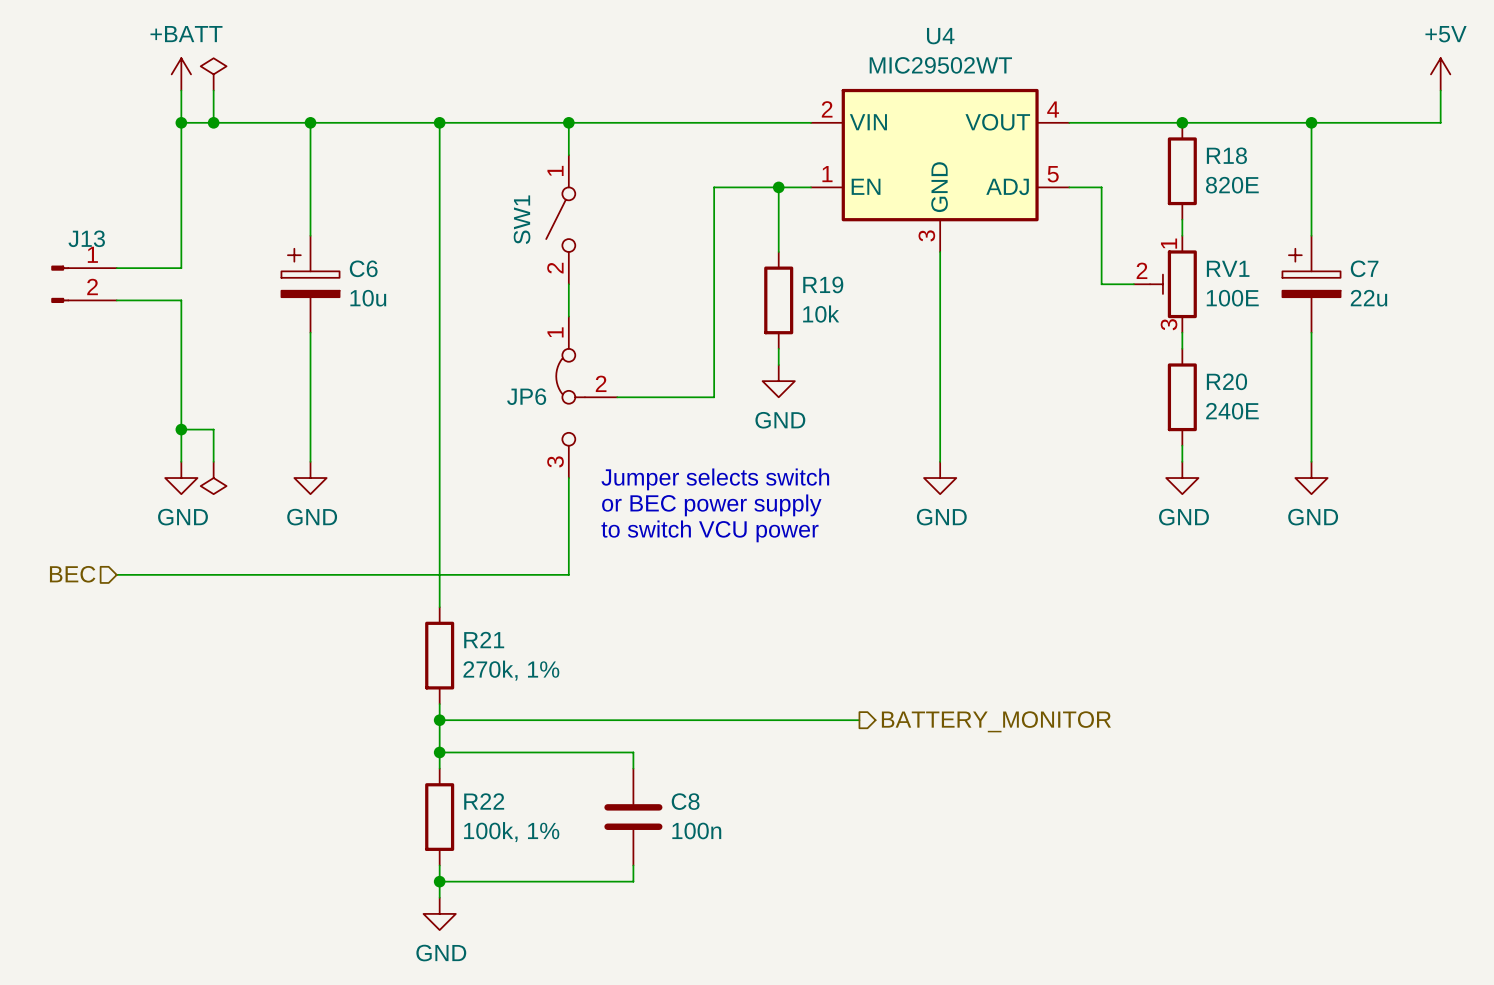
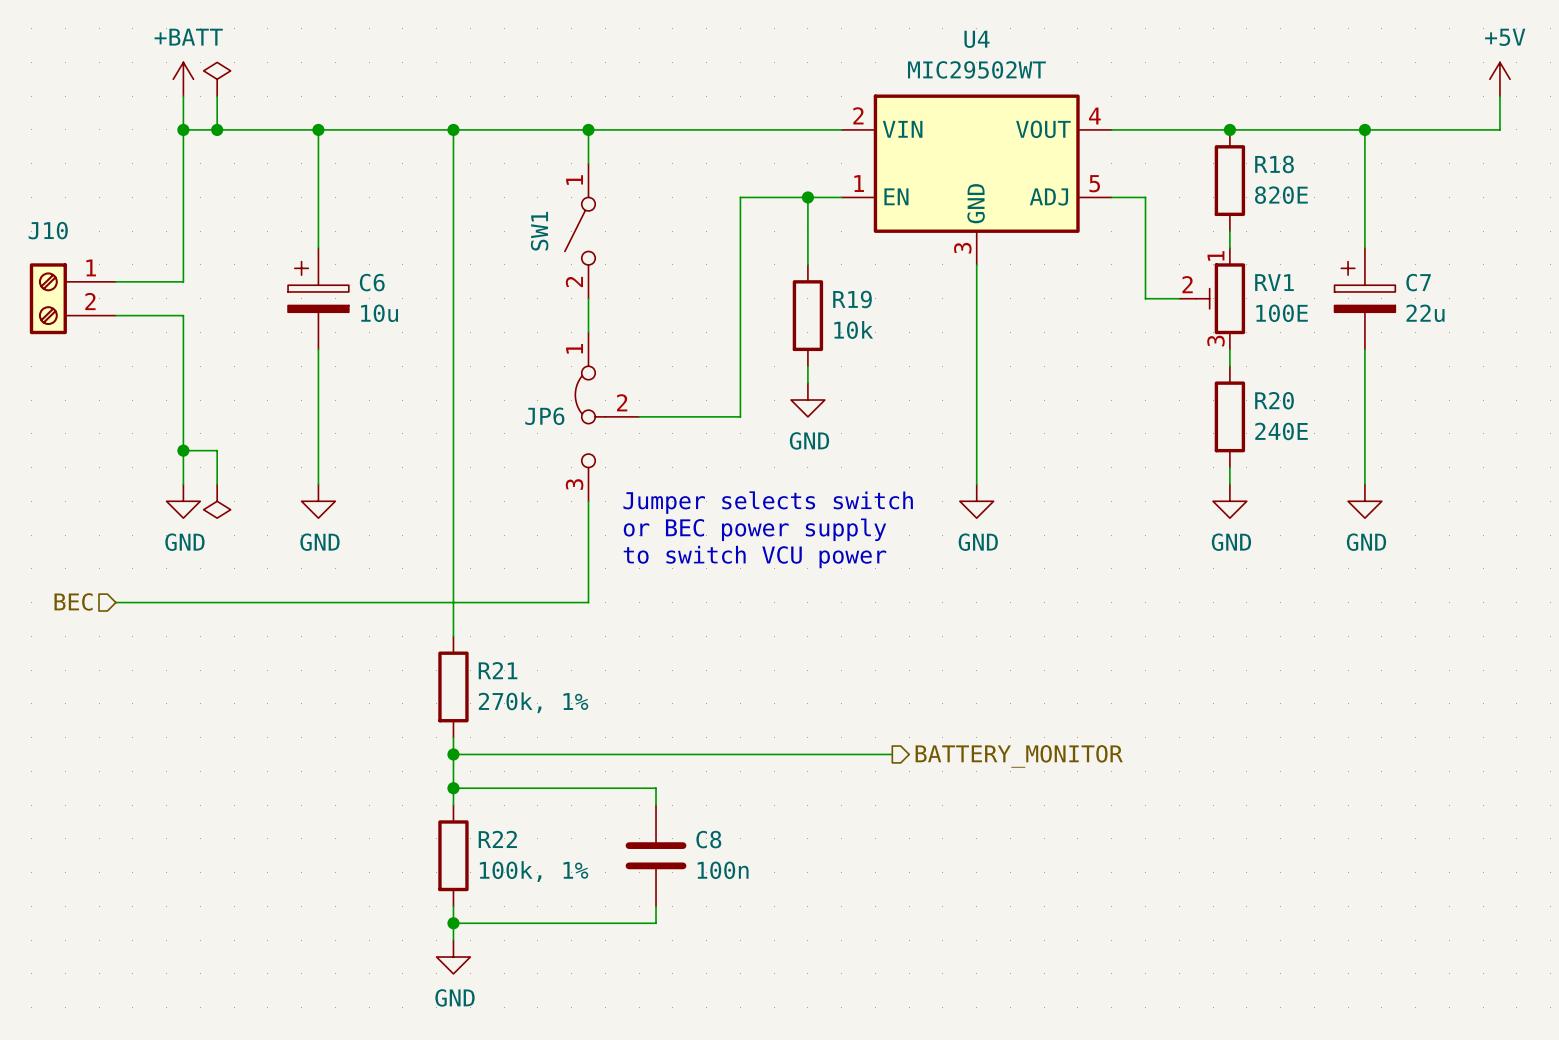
J10: none -> (72, 298)
J13: (83, 284) -> none

